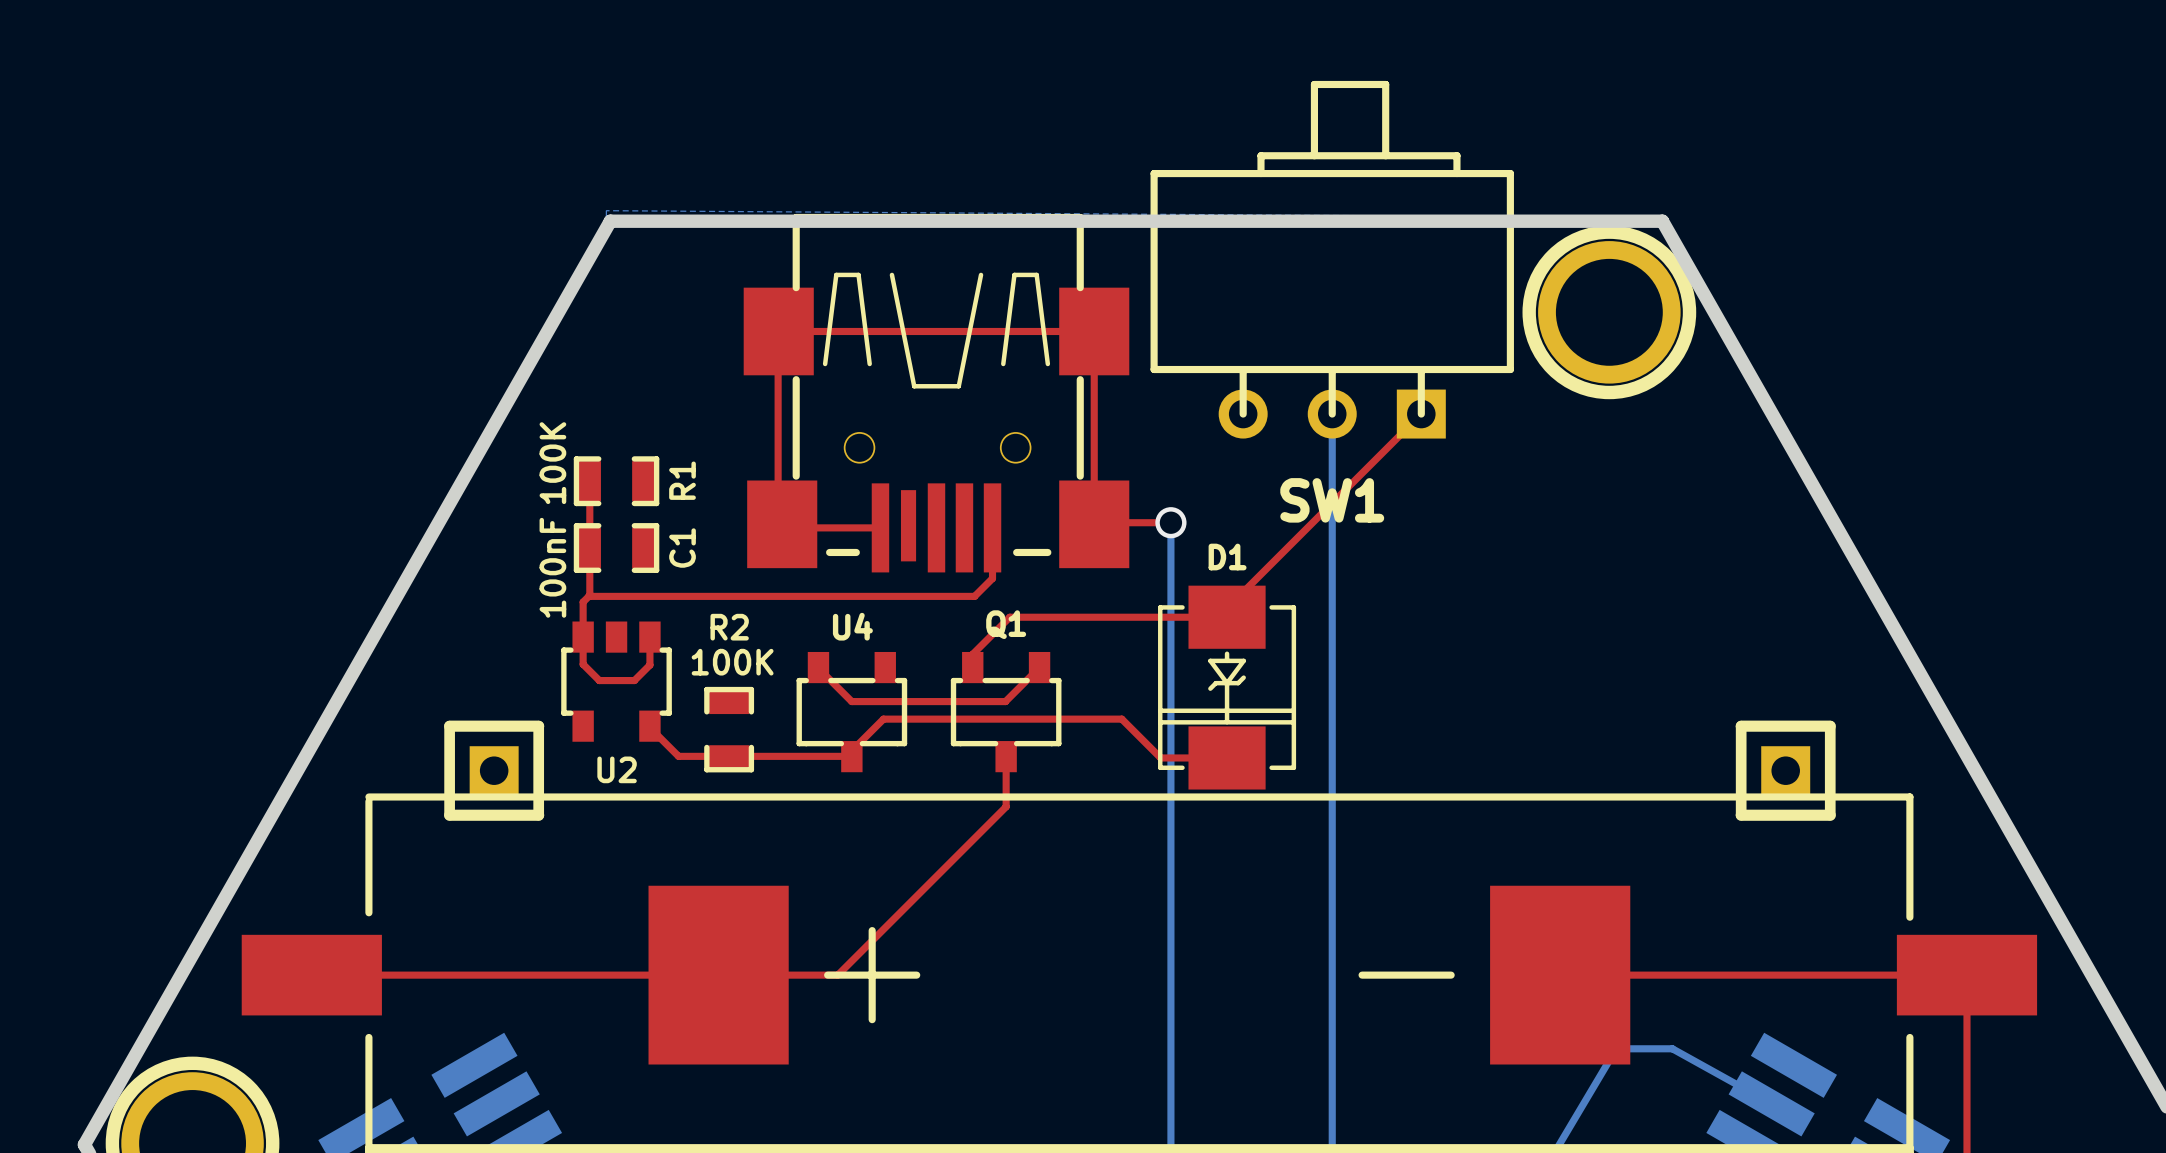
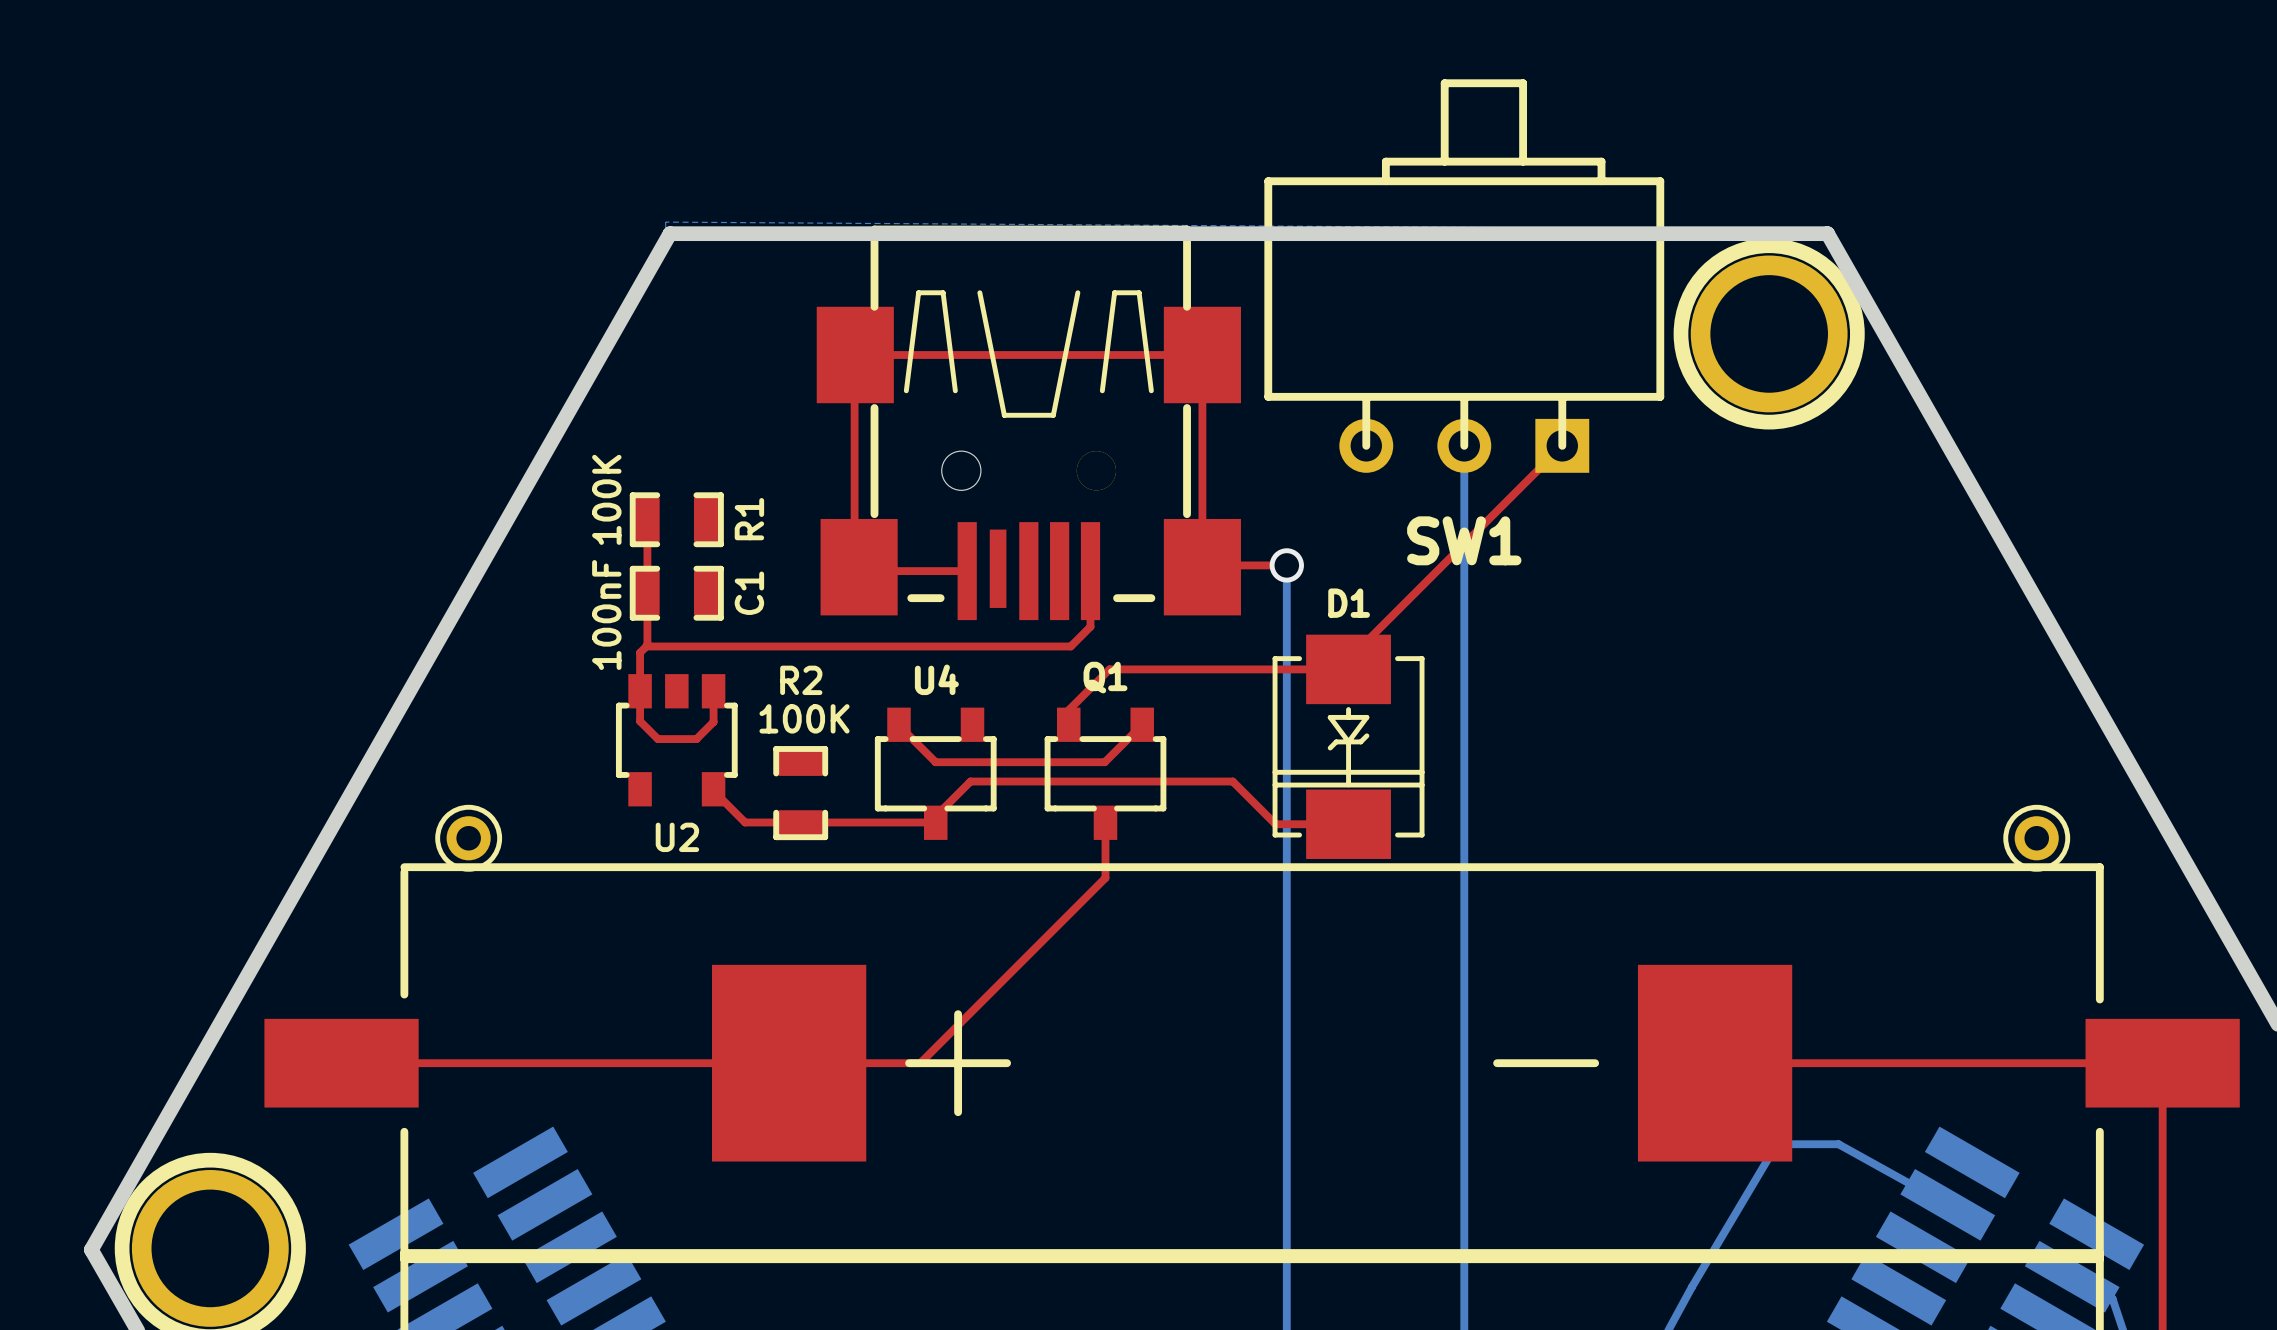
part footprint: [743, 213, 1130, 573] -> [816, 225, 1241, 621]
part: none -> (468, 838)
part: (494, 770) -> none
part: (1785, 770) -> none
part: none -> (2036, 838)

